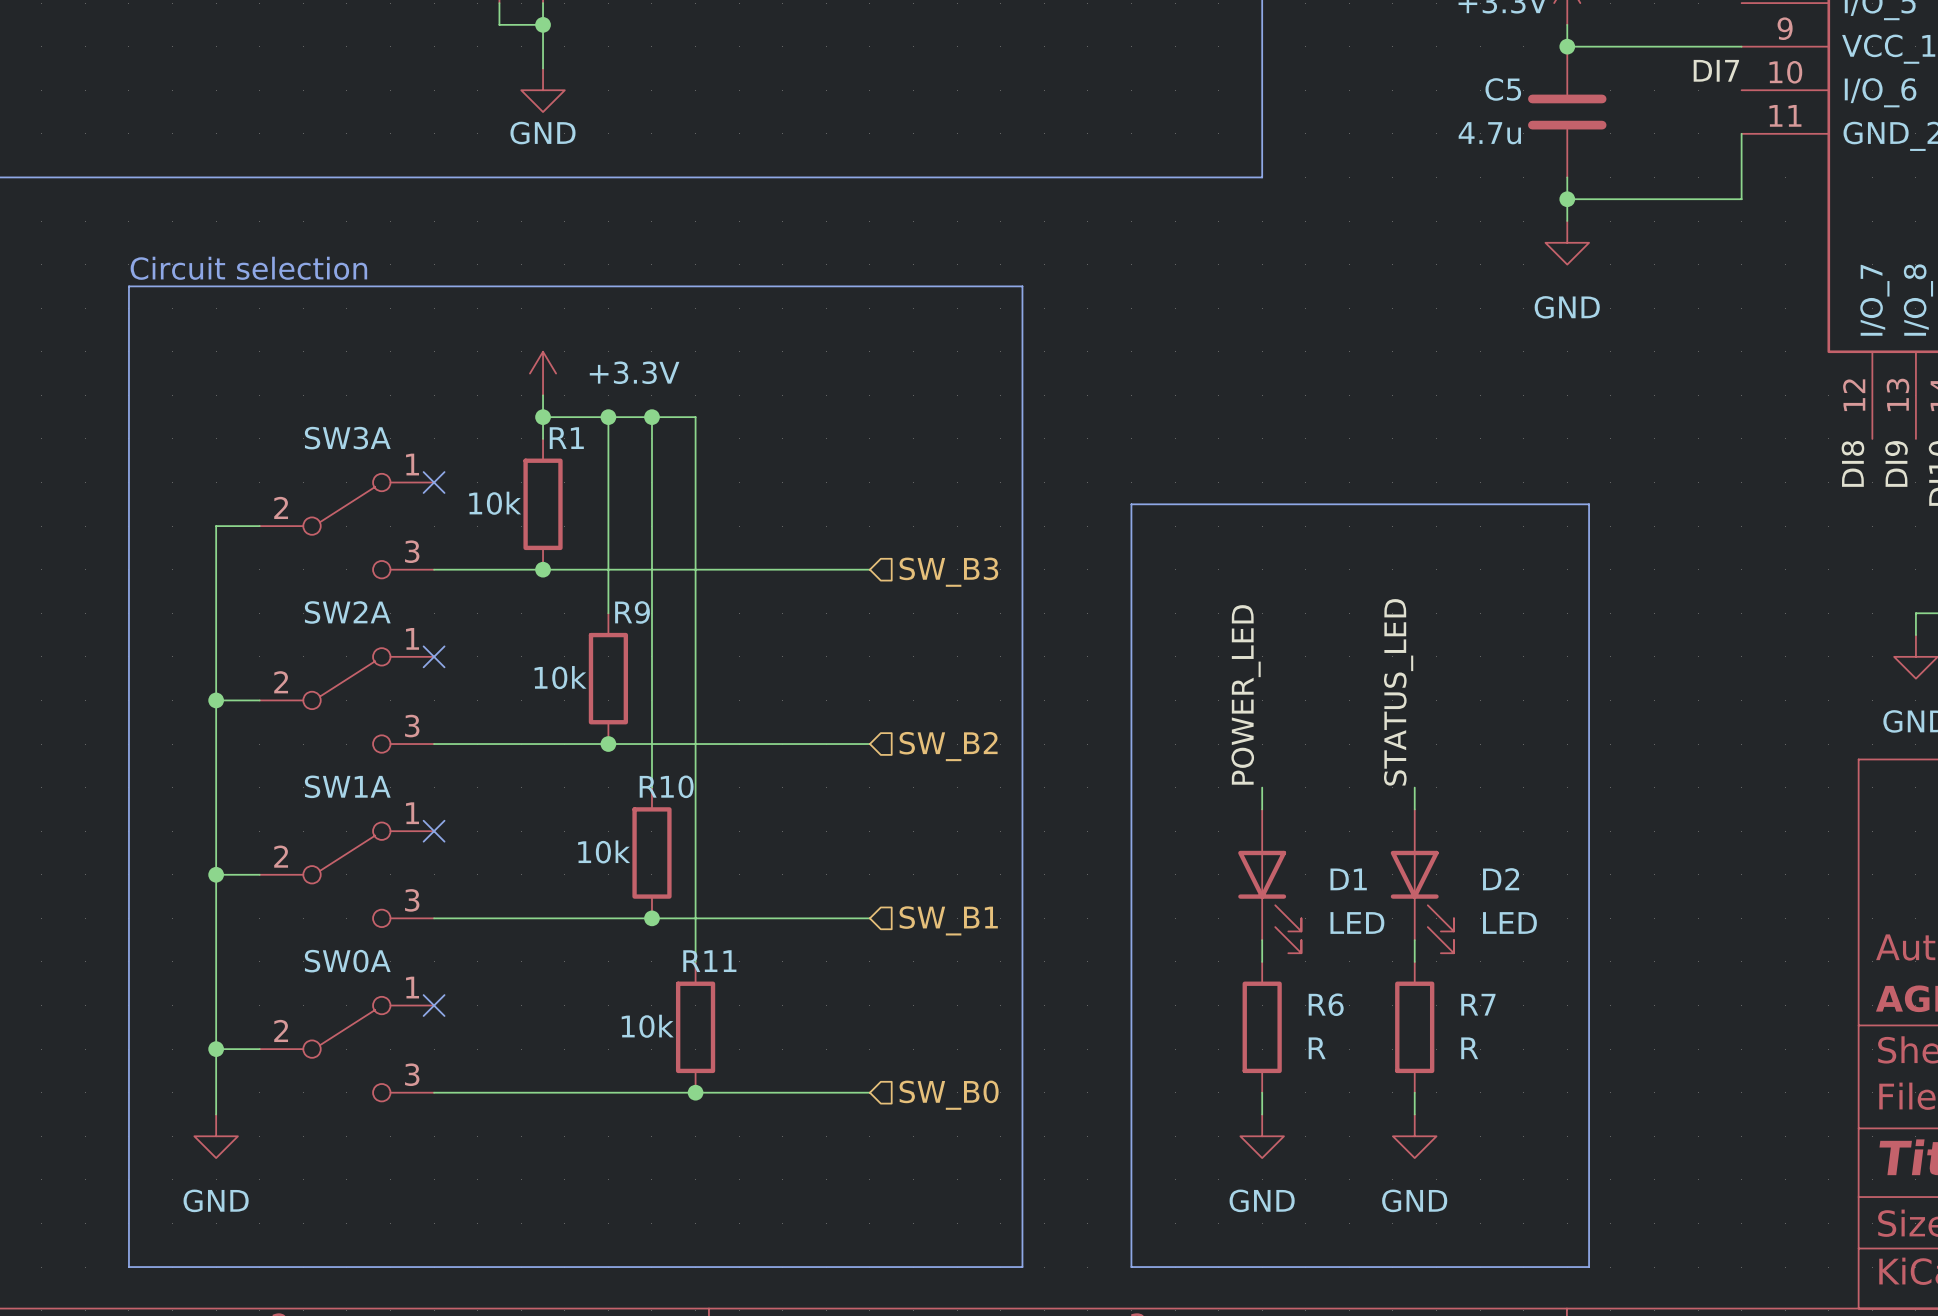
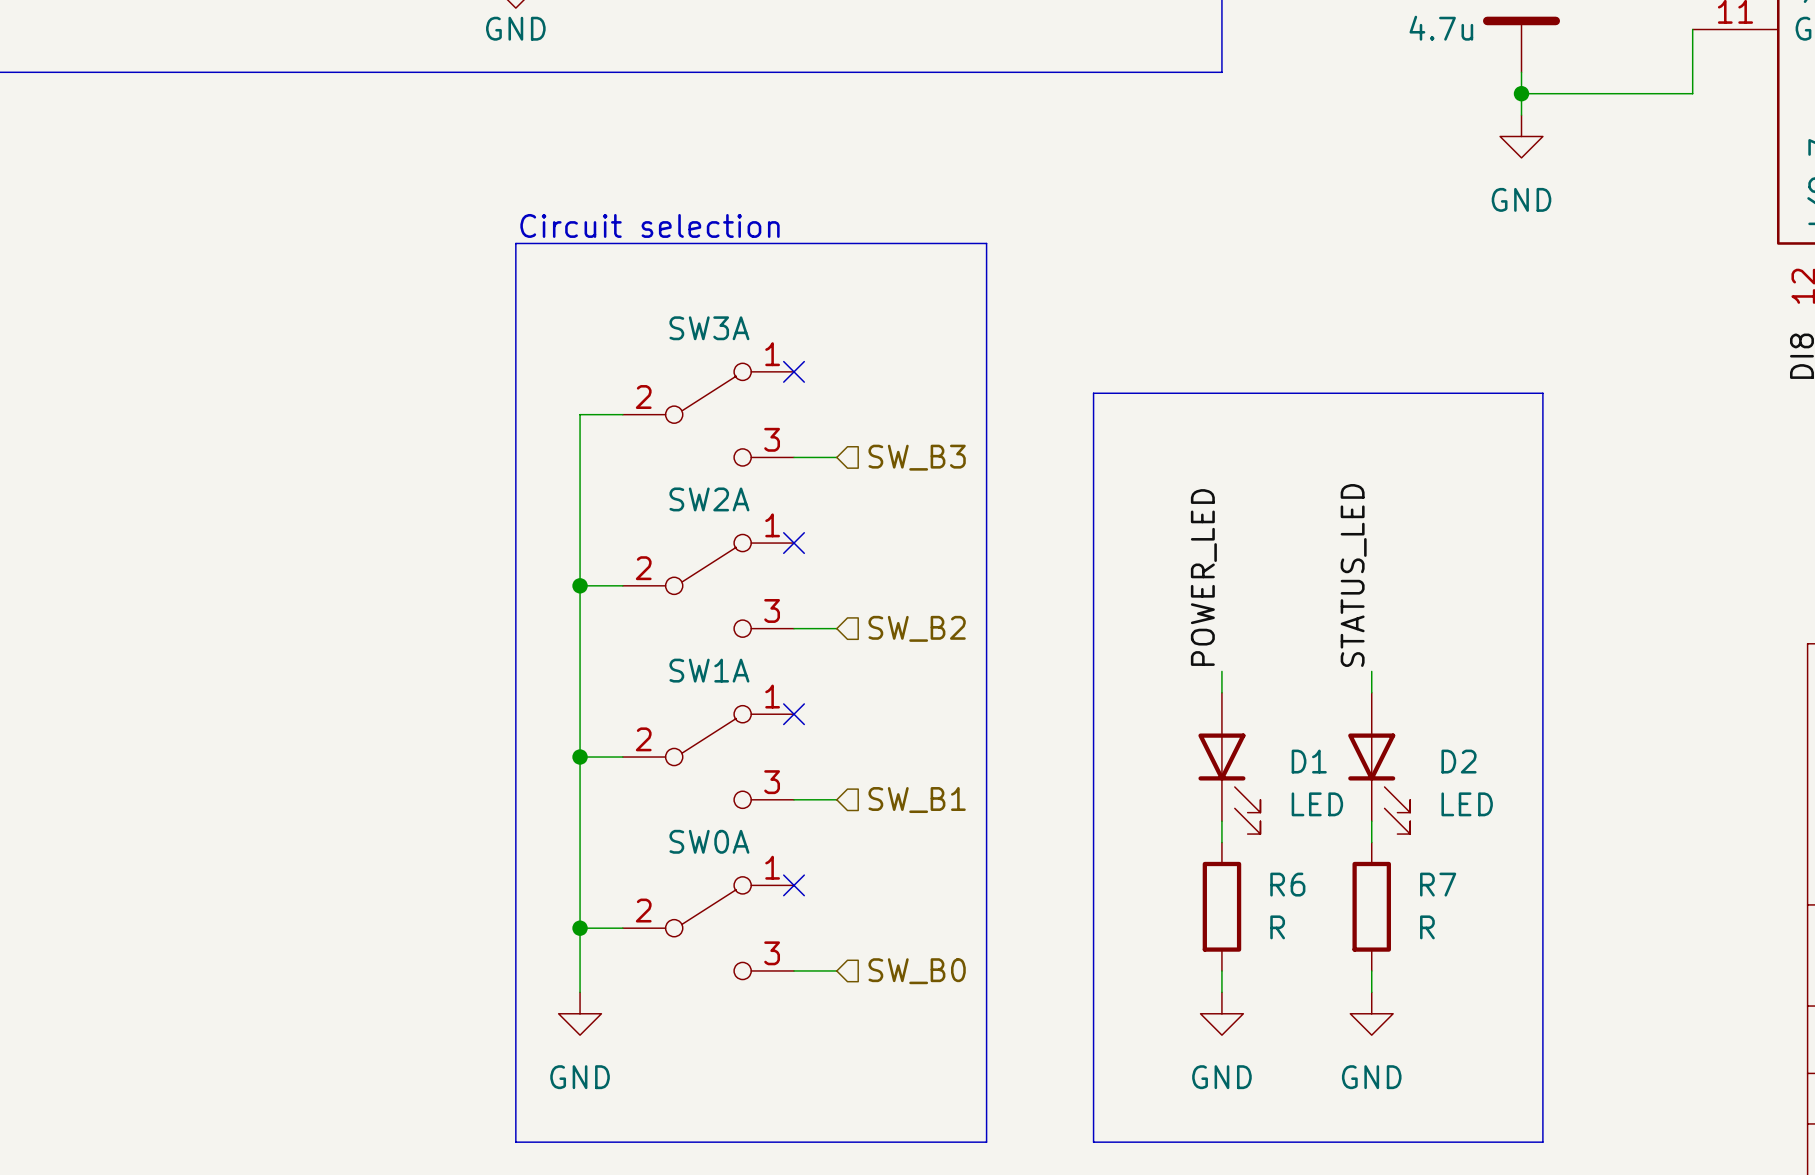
text position: Circuit selection (248, 268) -> Circuit selection (649, 225)
line: (1022, 351) (1022, 286) (128, 286) (128, 1267) (543, 1267) -> (986, 243) (515, 243) (515, 1142)
power symbol: +3.3V (543, 373) -> none
wire: (543, 417) (695, 417) (695, 961) -> none
junction: (543, 417) -> none
wire: (608, 417) (608, 526) -> (622, 414) (580, 414)
junction: (608, 417) -> none
wire: (651, 417) (651, 787) -> none
junction: (651, 417) -> none
no-connect mark: (434, 482) -> none
no-connect mark: none -> (794, 371)
R1: 10k (543, 504) -> none
wire: (259, 526) (216, 526) (216, 1114) -> none
SW3A position: (346, 526) -> (708, 414)
wire: (434, 569) (826, 569) -> none
junction: (543, 569) -> none
wire: none -> (580, 500) (580, 992)
no-connect mark: (434, 656) -> none
no-connect mark: none -> (794, 543)
R9: 10k (608, 678) -> none
wire: (216, 700) (259, 700) -> (580, 585) (622, 585)
junction: (216, 700) -> none
SW2A position: (346, 700) -> (708, 585)
wire: (434, 744) (826, 744) -> none
junction position: (608, 744) -> (580, 585)
no-connect mark: (434, 831) -> none
no-connect mark: none -> (794, 714)
R10: 10k (651, 852) -> none
wire: (216, 874) (259, 874) -> (580, 757) (622, 757)
junction: (216, 874) -> none
SW1A position: (346, 874) -> (708, 757)
wire: (434, 918) (826, 918) -> none
junction position: (651, 918) -> (580, 757)
no-connect mark: (434, 1005) -> none
no-connect mark: none -> (794, 885)
R11: 10k (695, 1027) -> none
wire: (216, 1049) (259, 1049) -> (580, 928) (622, 928)
junction: (216, 1049) -> none
SW0A position: (346, 1049) -> (708, 928)
junction: none -> (580, 928)
wire: (434, 1092) (826, 1092) -> none
junction: (695, 1092) -> none
power symbol position: GND (216, 1136) -> GND (580, 1013)

